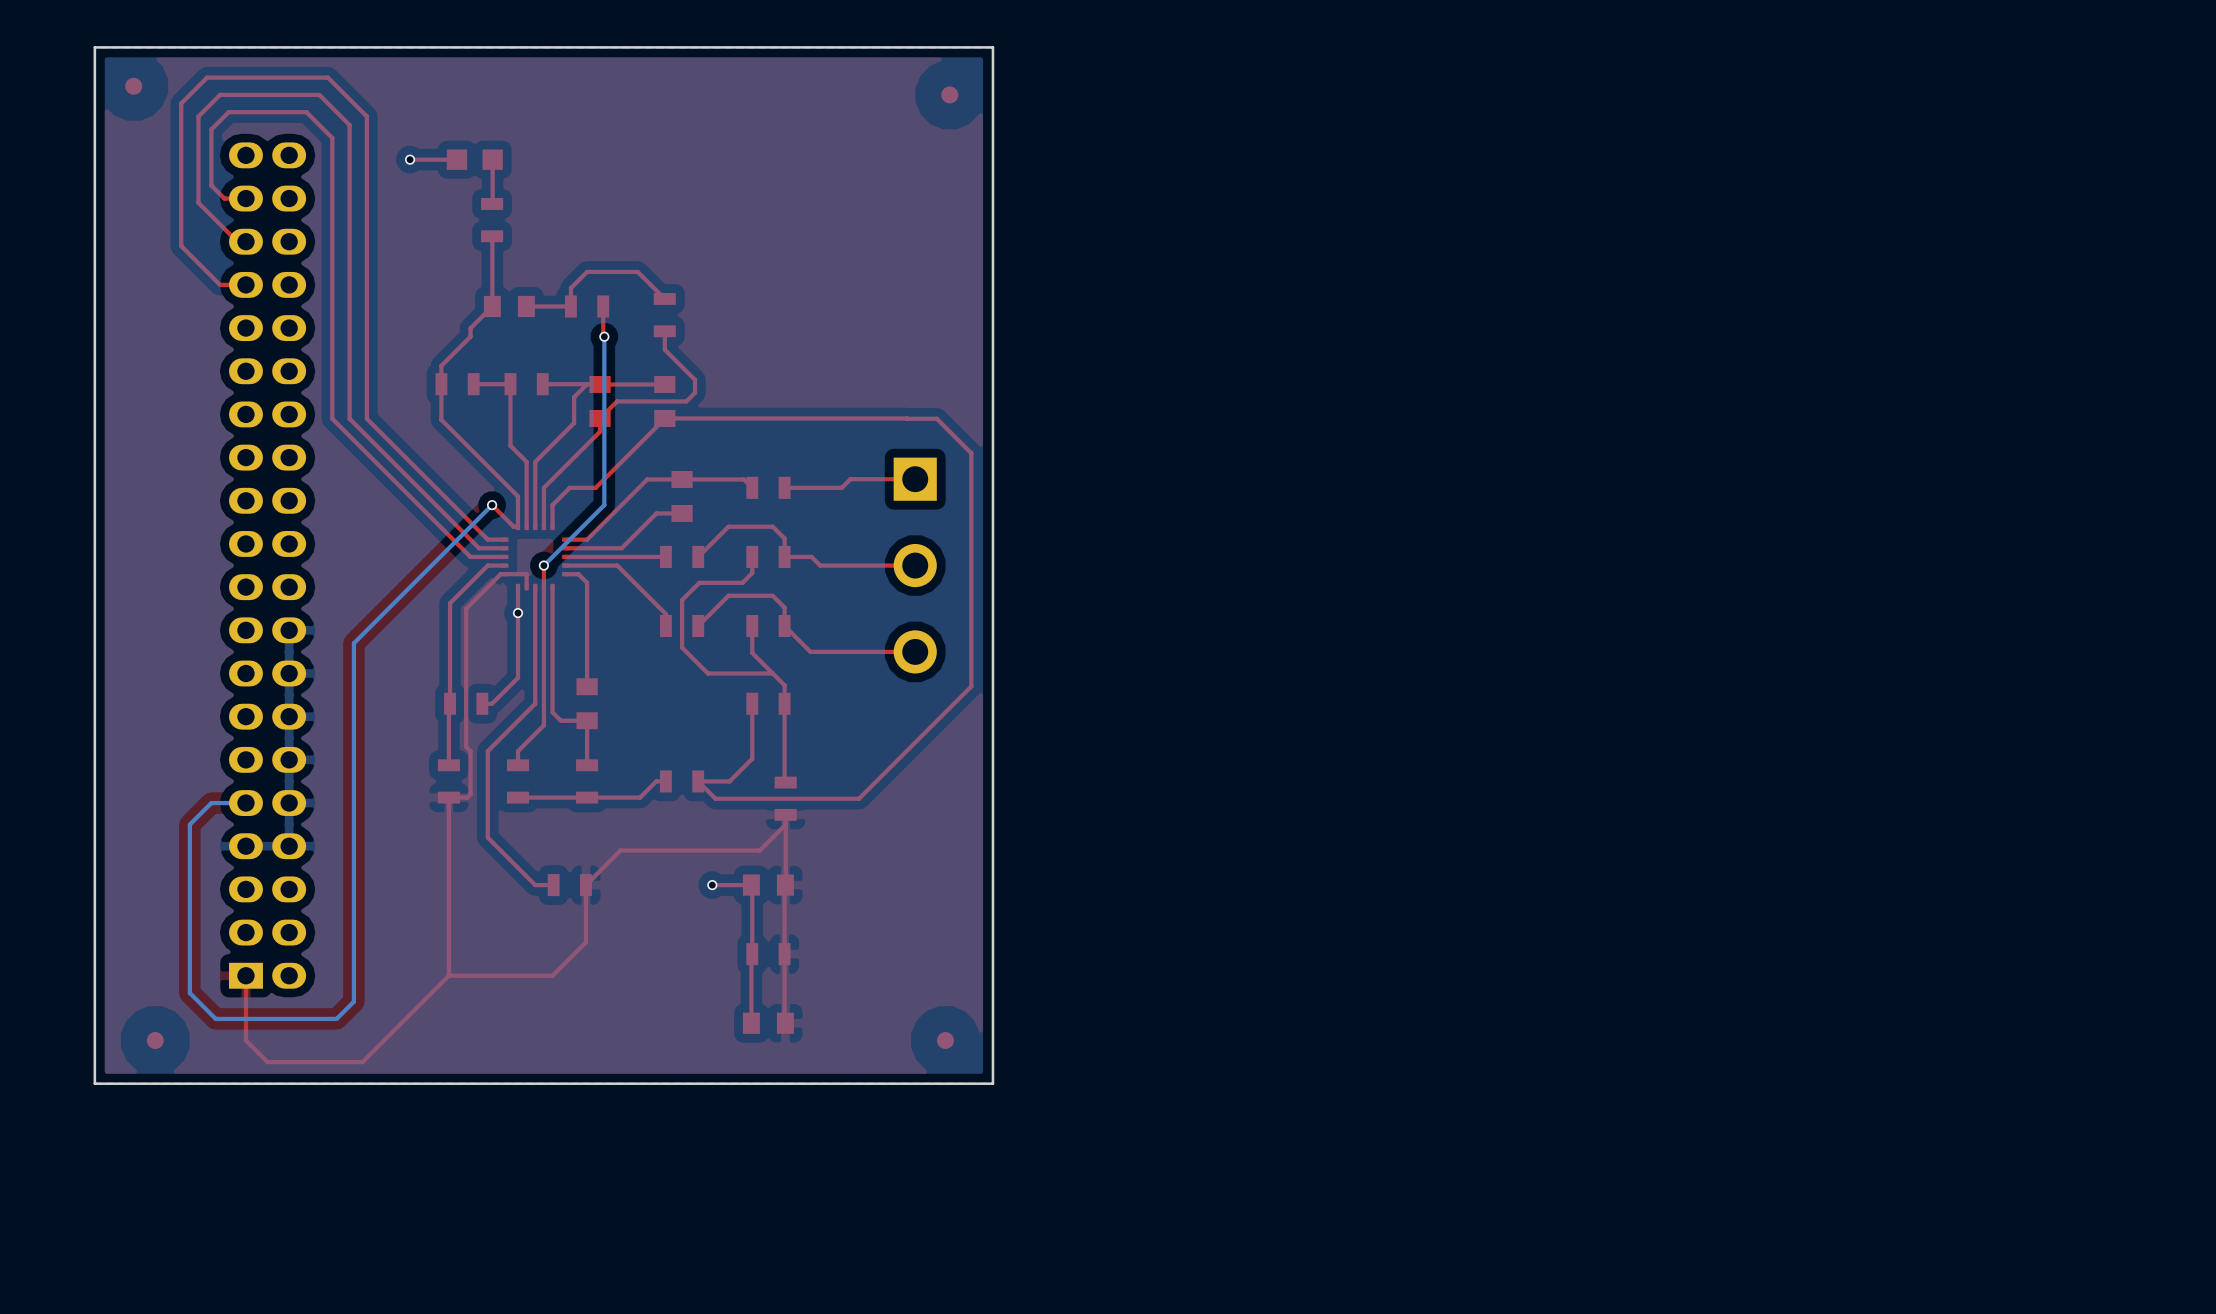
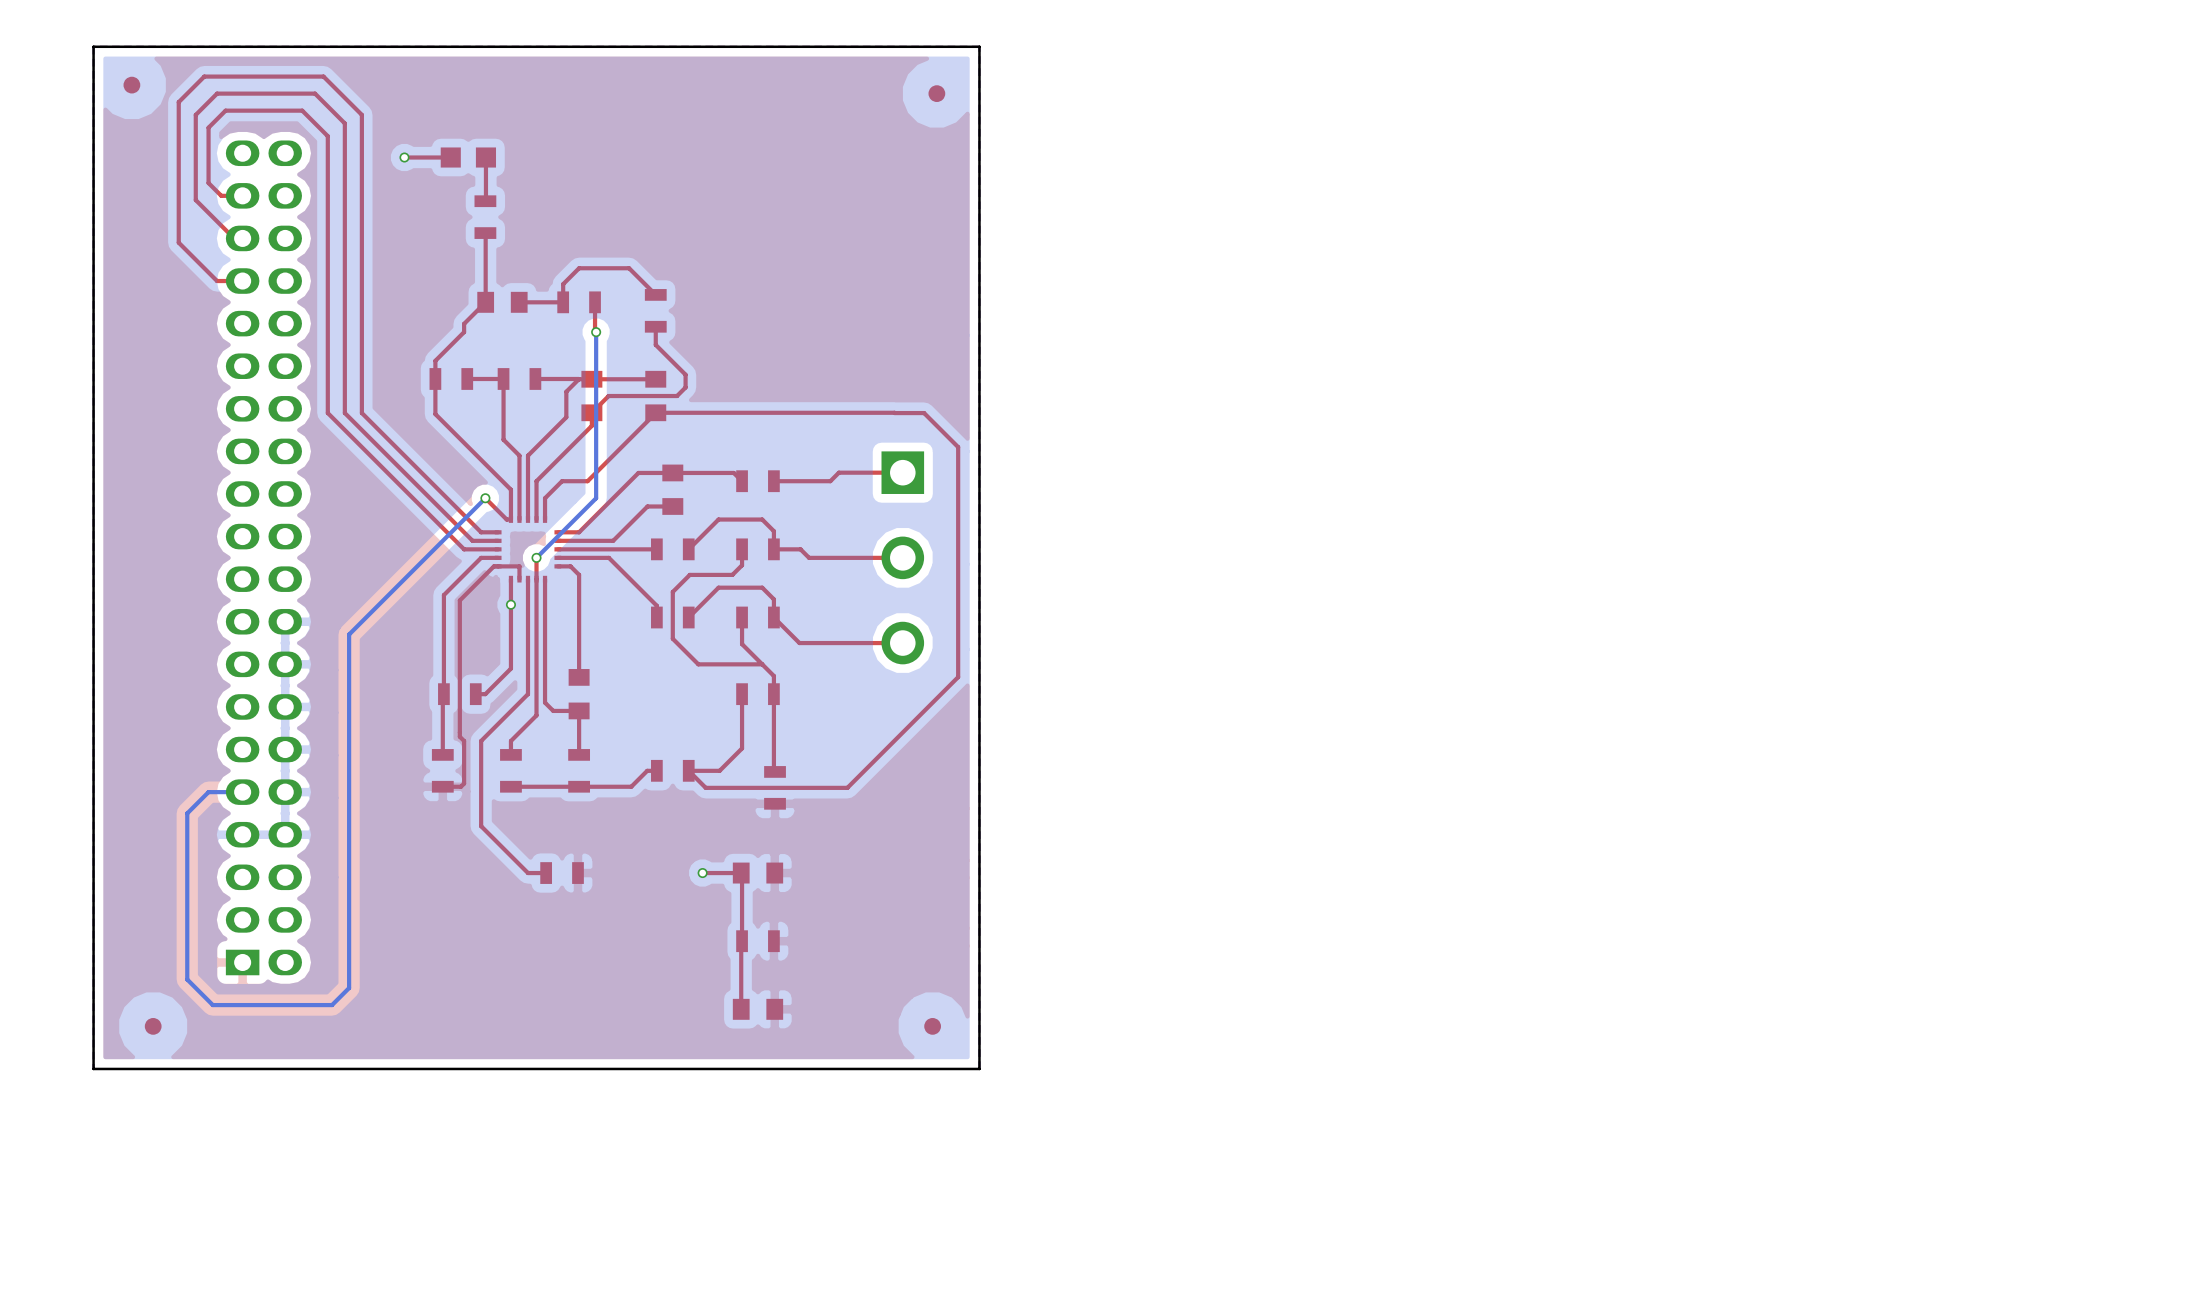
top track: (448, 797) (448, 975) -> none
top track: (785, 814) (785, 884) -> none
top track: (785, 824) (759, 850) (620, 850) (585, 885) (585, 942) (552, 975) (448, 975) -> none
top track: (784, 885) (784, 1022) -> none
top track: (448, 975) (362, 1062) (267, 1062) (245, 1040) (245, 975) -> none

